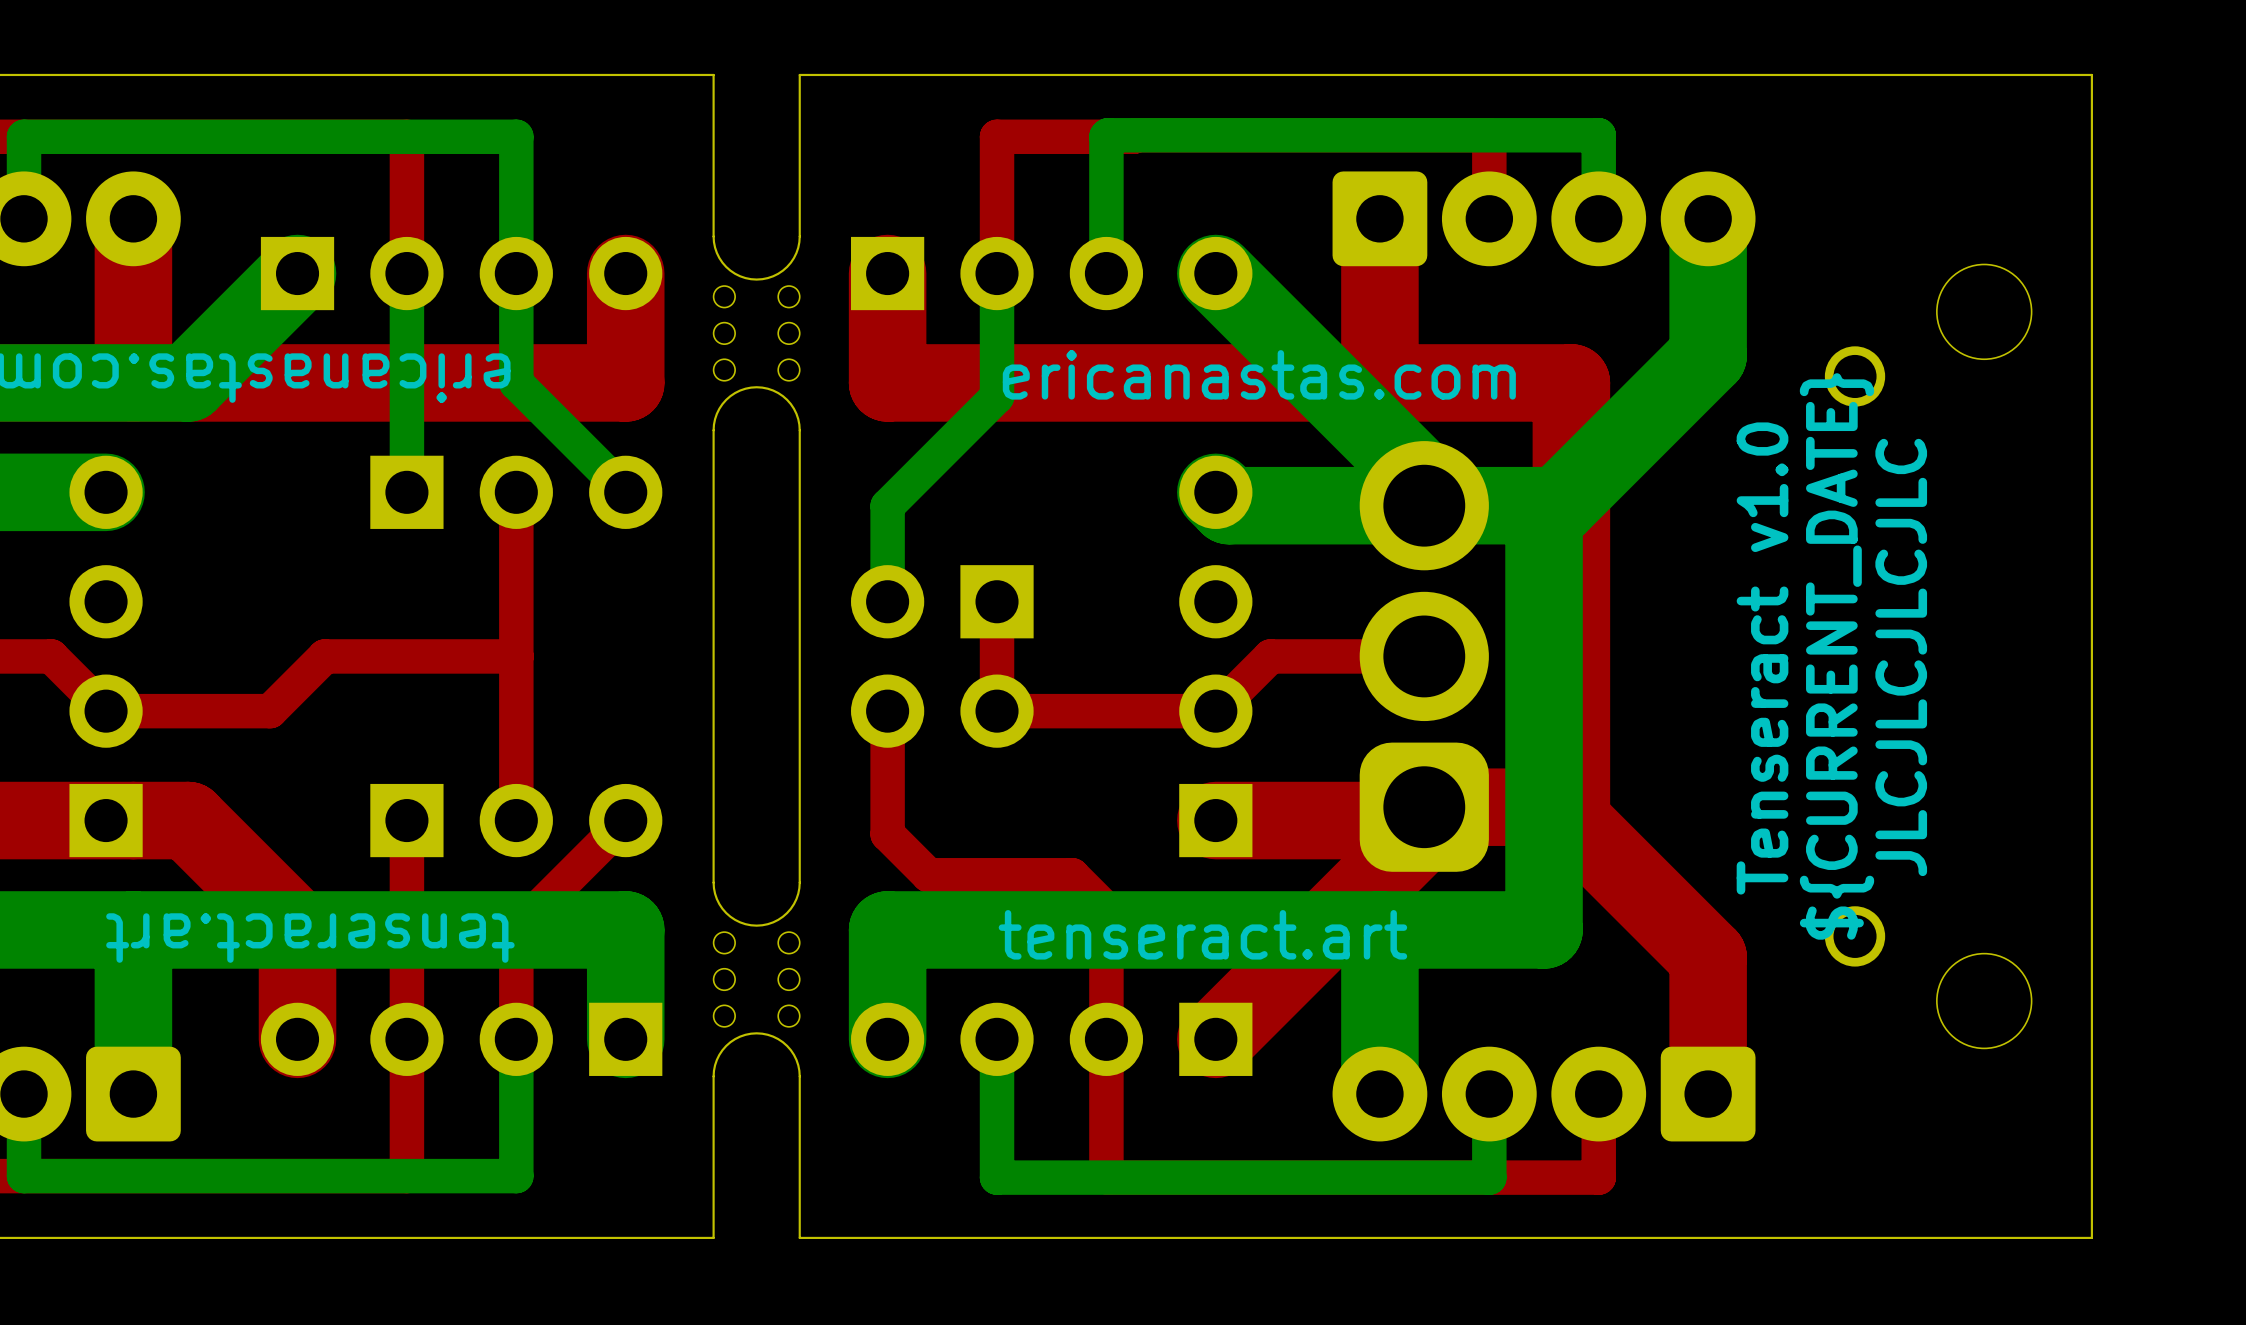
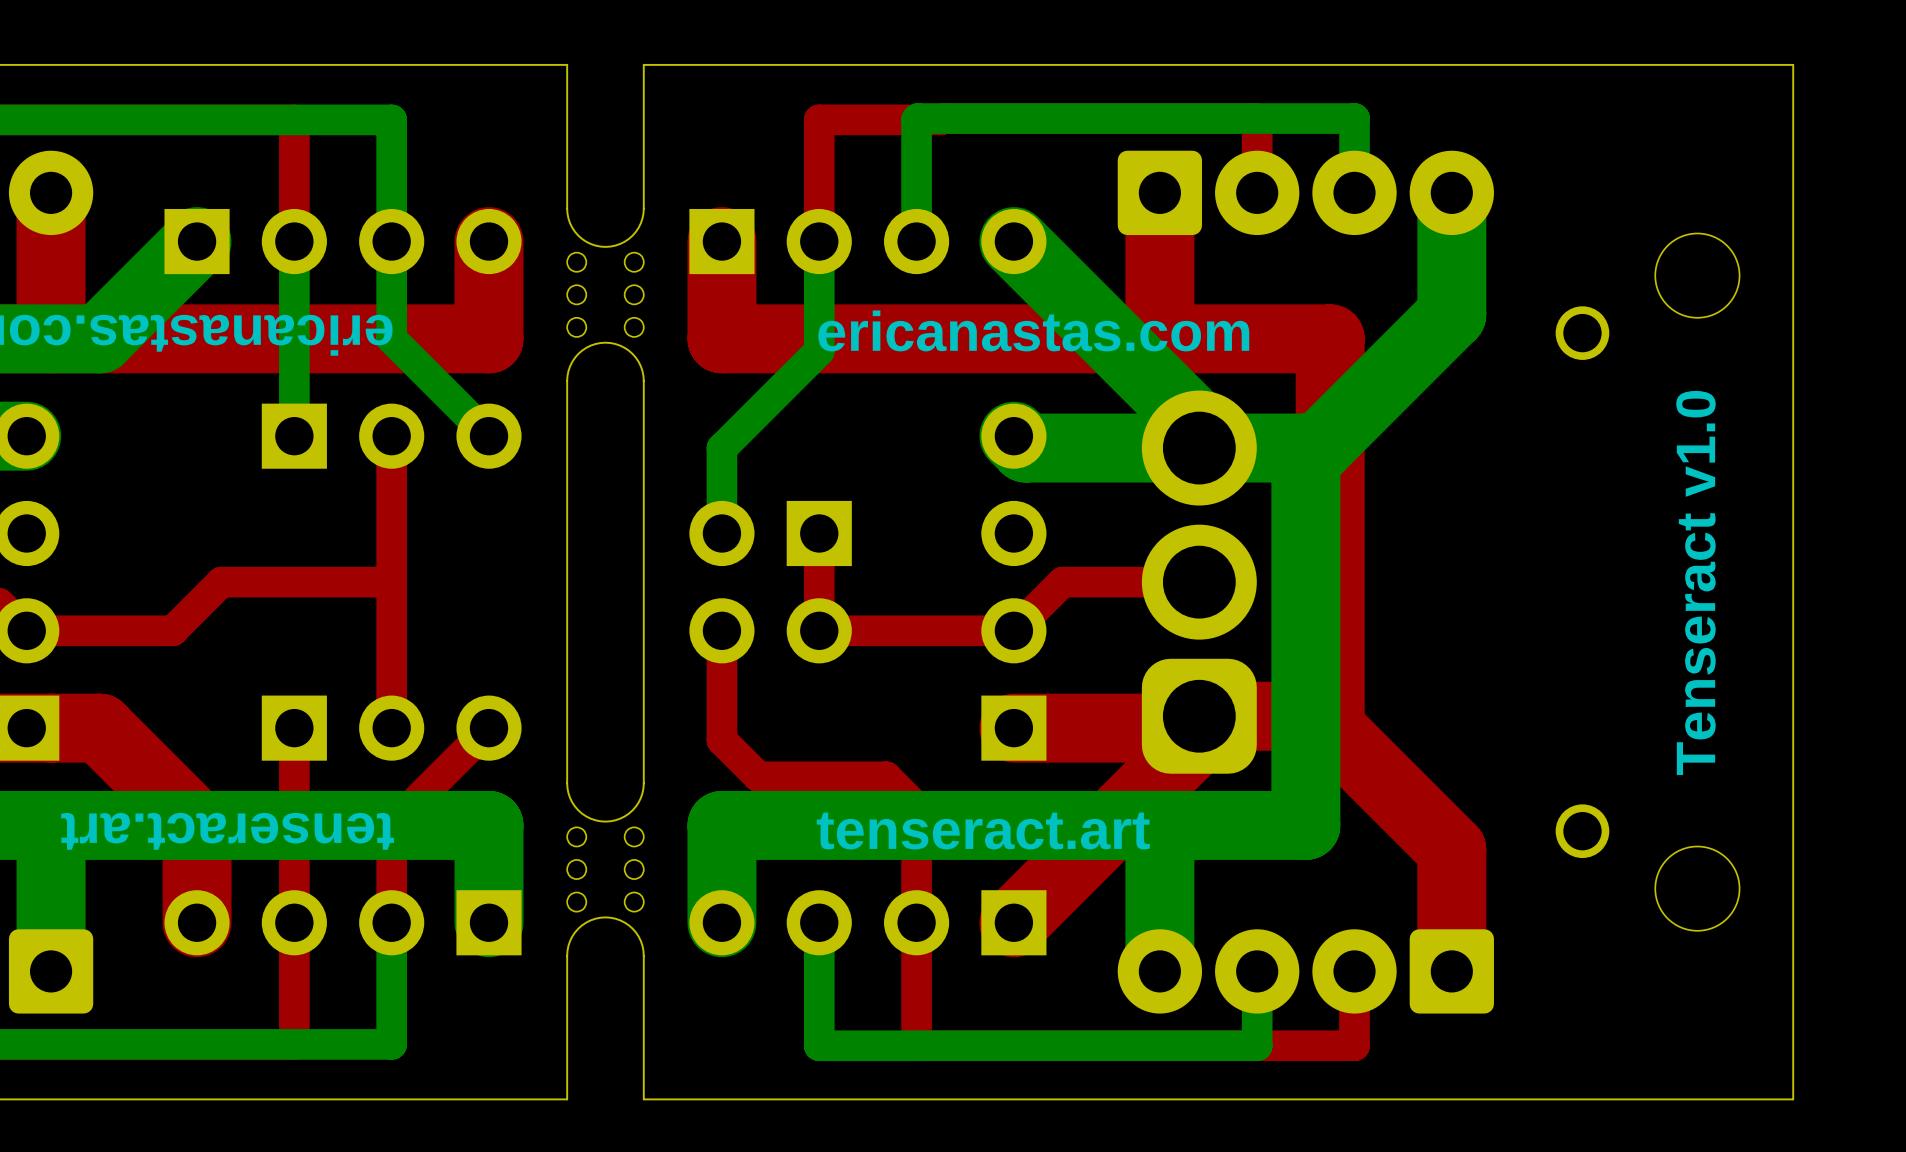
text: ${CURRENT_DATE} (1836, 656) -> none
text: JLCJLCJLCJLC (1901, 657) -> none
text position: Tenseract v1.0 (1762, 658) -> Tenseract v1.0 (1695, 582)

